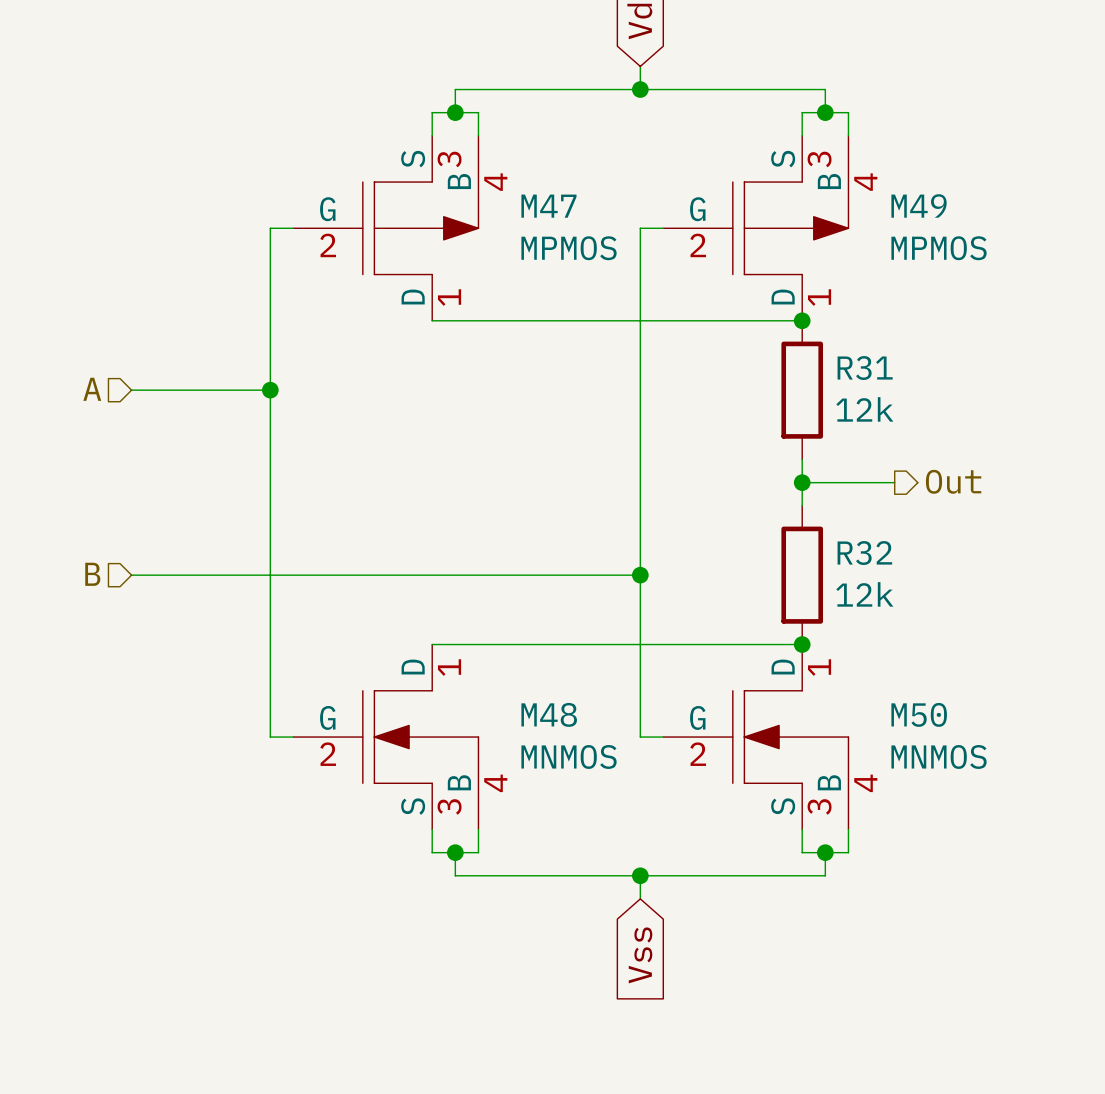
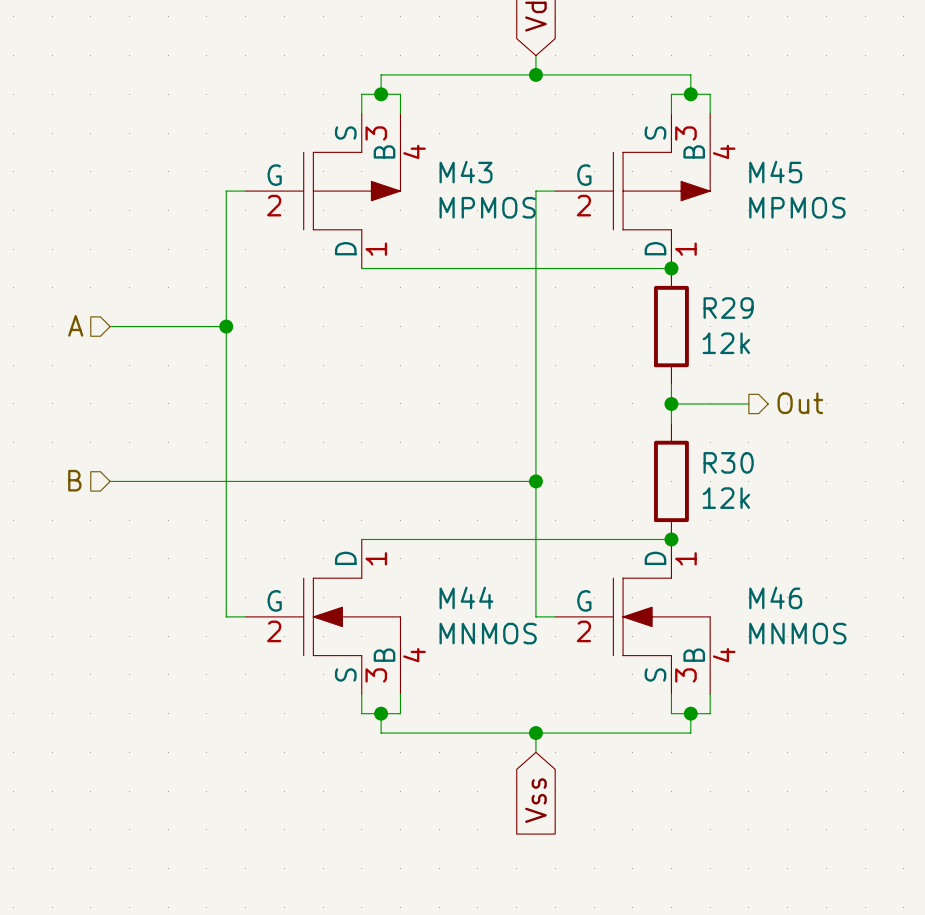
M49 name: M49 (919, 205) -> M45 (775, 172)
M47 name: M47 (548, 206) -> M43 (466, 172)
R31 name: R31 (865, 368) -> R29 (728, 308)
R32 name: R32 (864, 553) -> R30 (728, 462)
M48 name: M48 (549, 714) -> M44 (466, 597)
M50 name: M50 (919, 714) -> M46 (775, 597)

